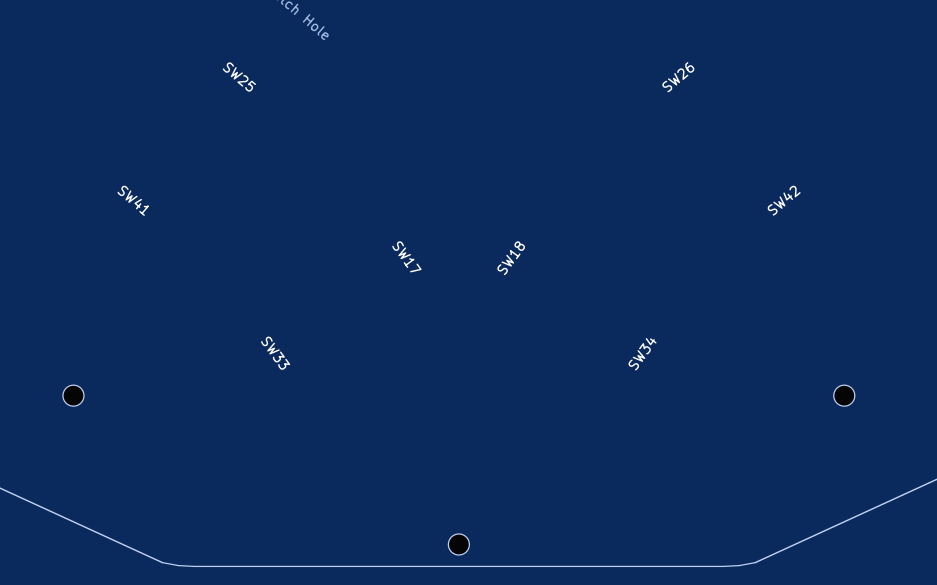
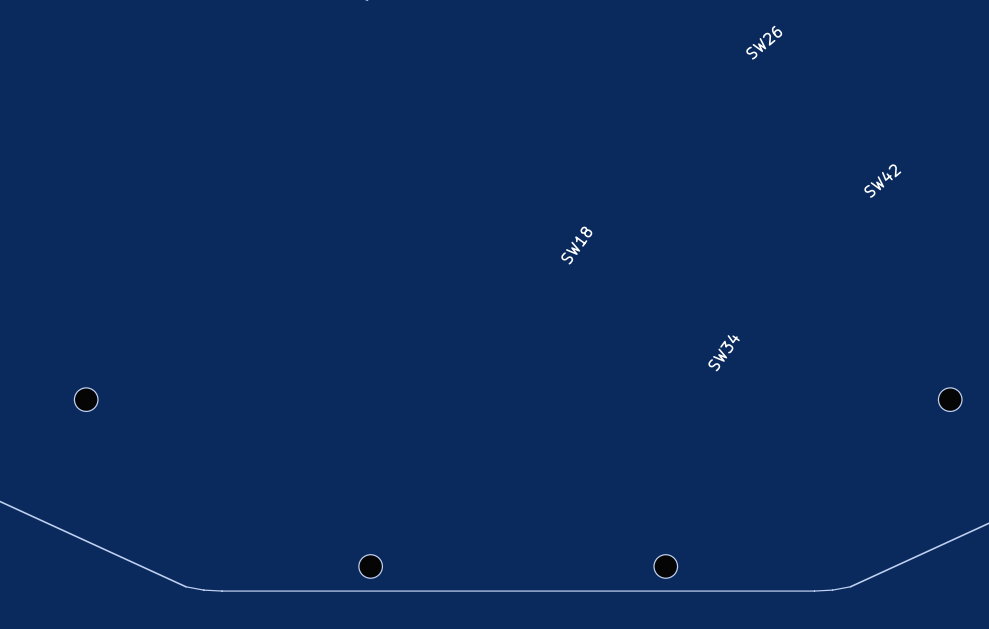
SW25: (239, 77) -> none
SW41: (133, 200) -> none
SW17: (406, 256) -> none
SW33: (275, 353) -> none
part: none -> (370, 566)
part: (458, 544) -> none
part: none -> (665, 566)

